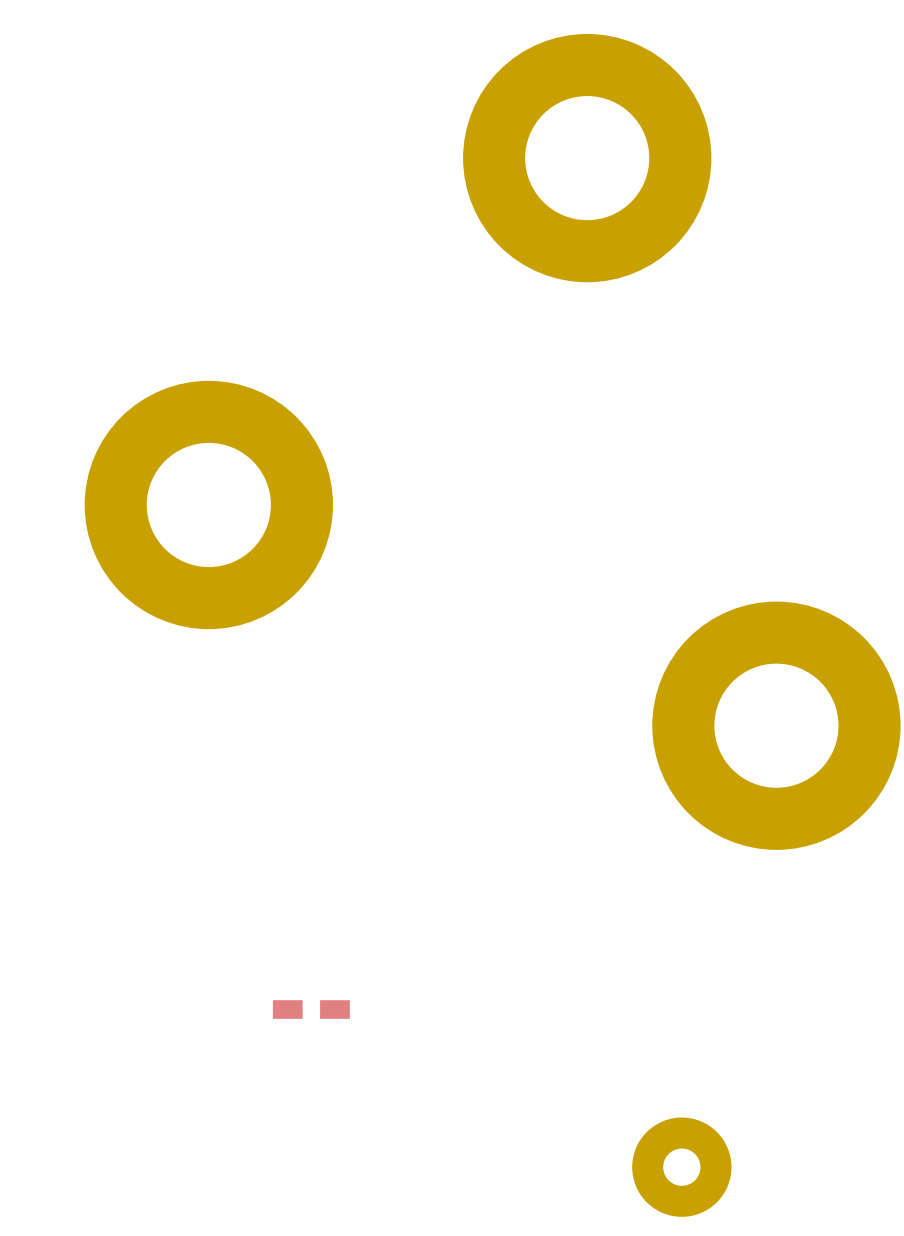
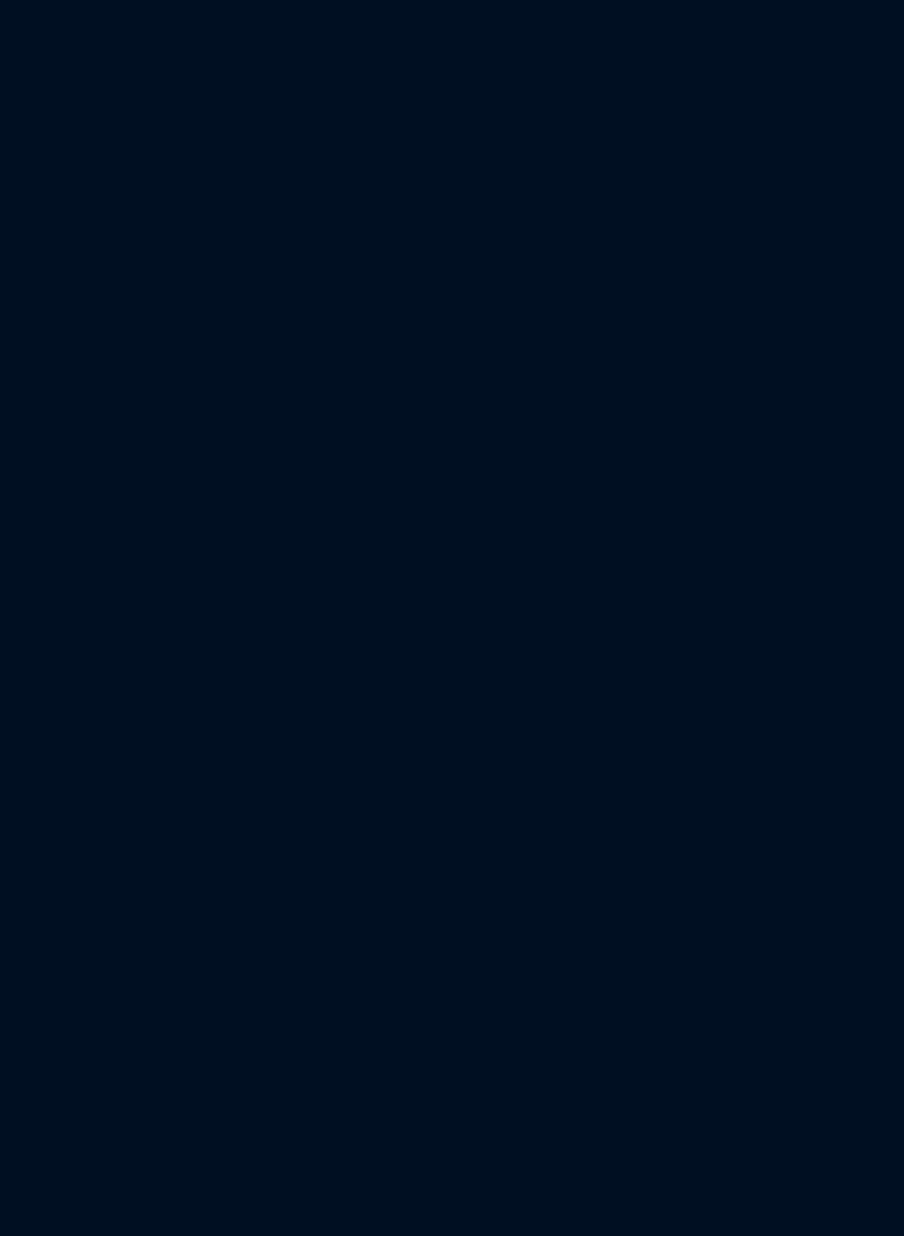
part: (587, 158) -> none
part: (208, 504) -> none
part: (776, 725) -> none
part: (311, 1009) -> none
part: (681, 1167) -> none

